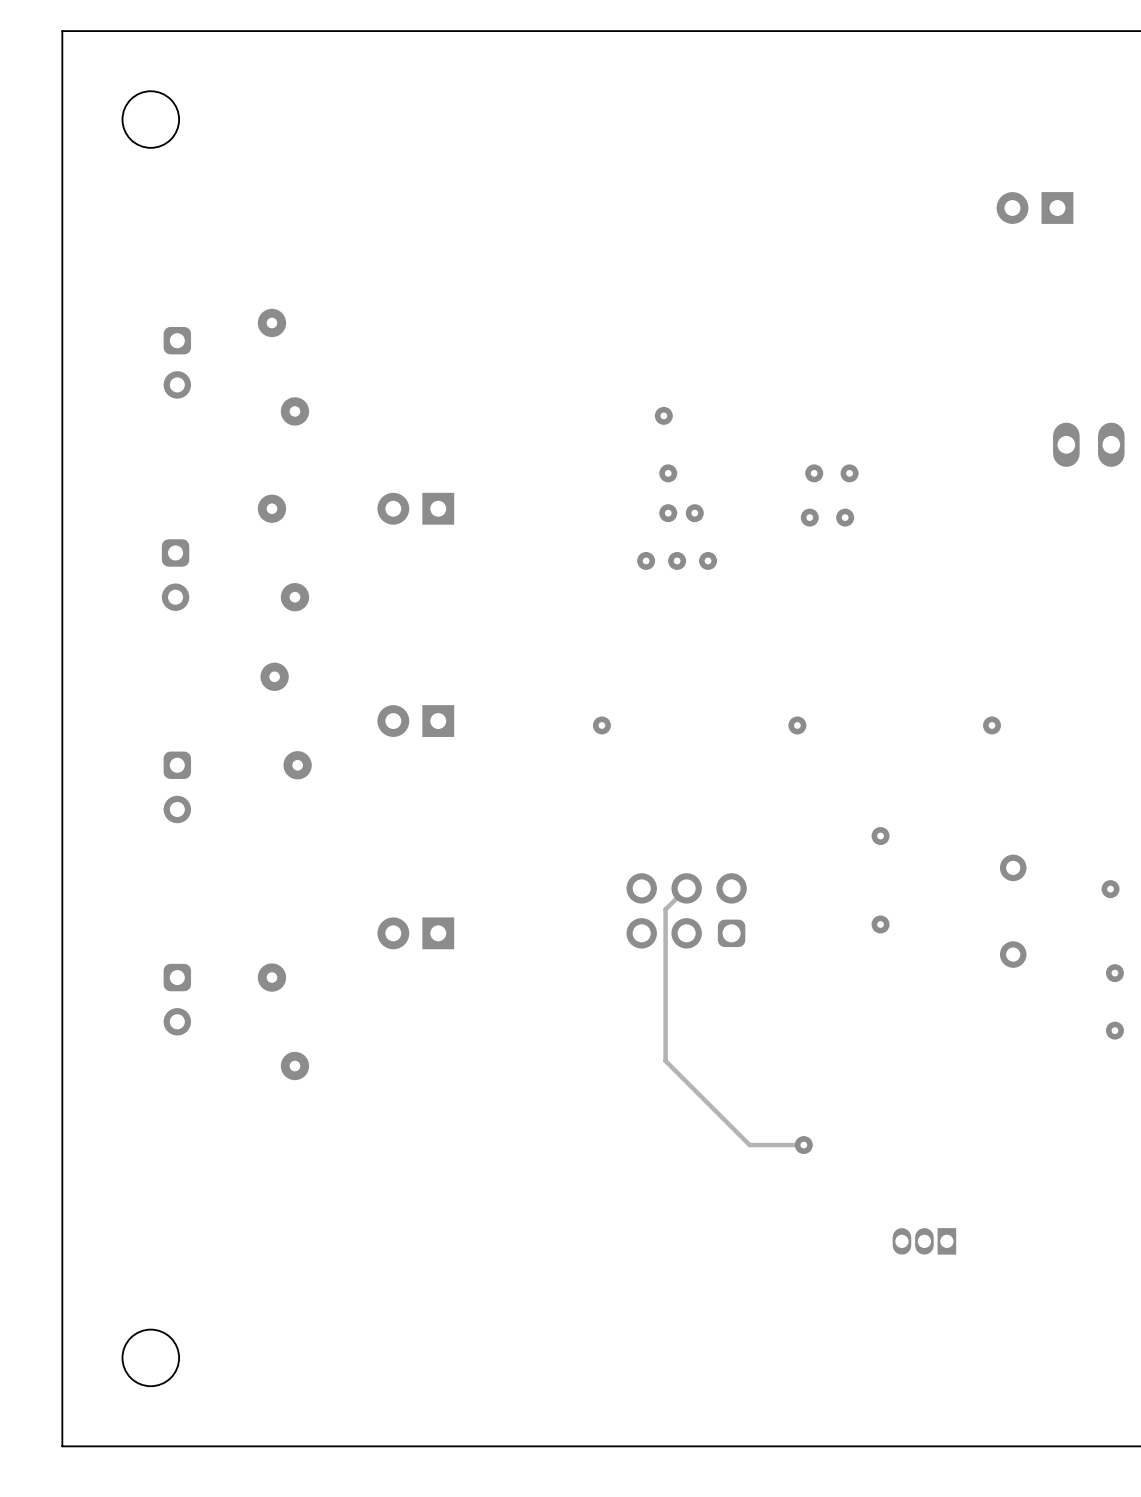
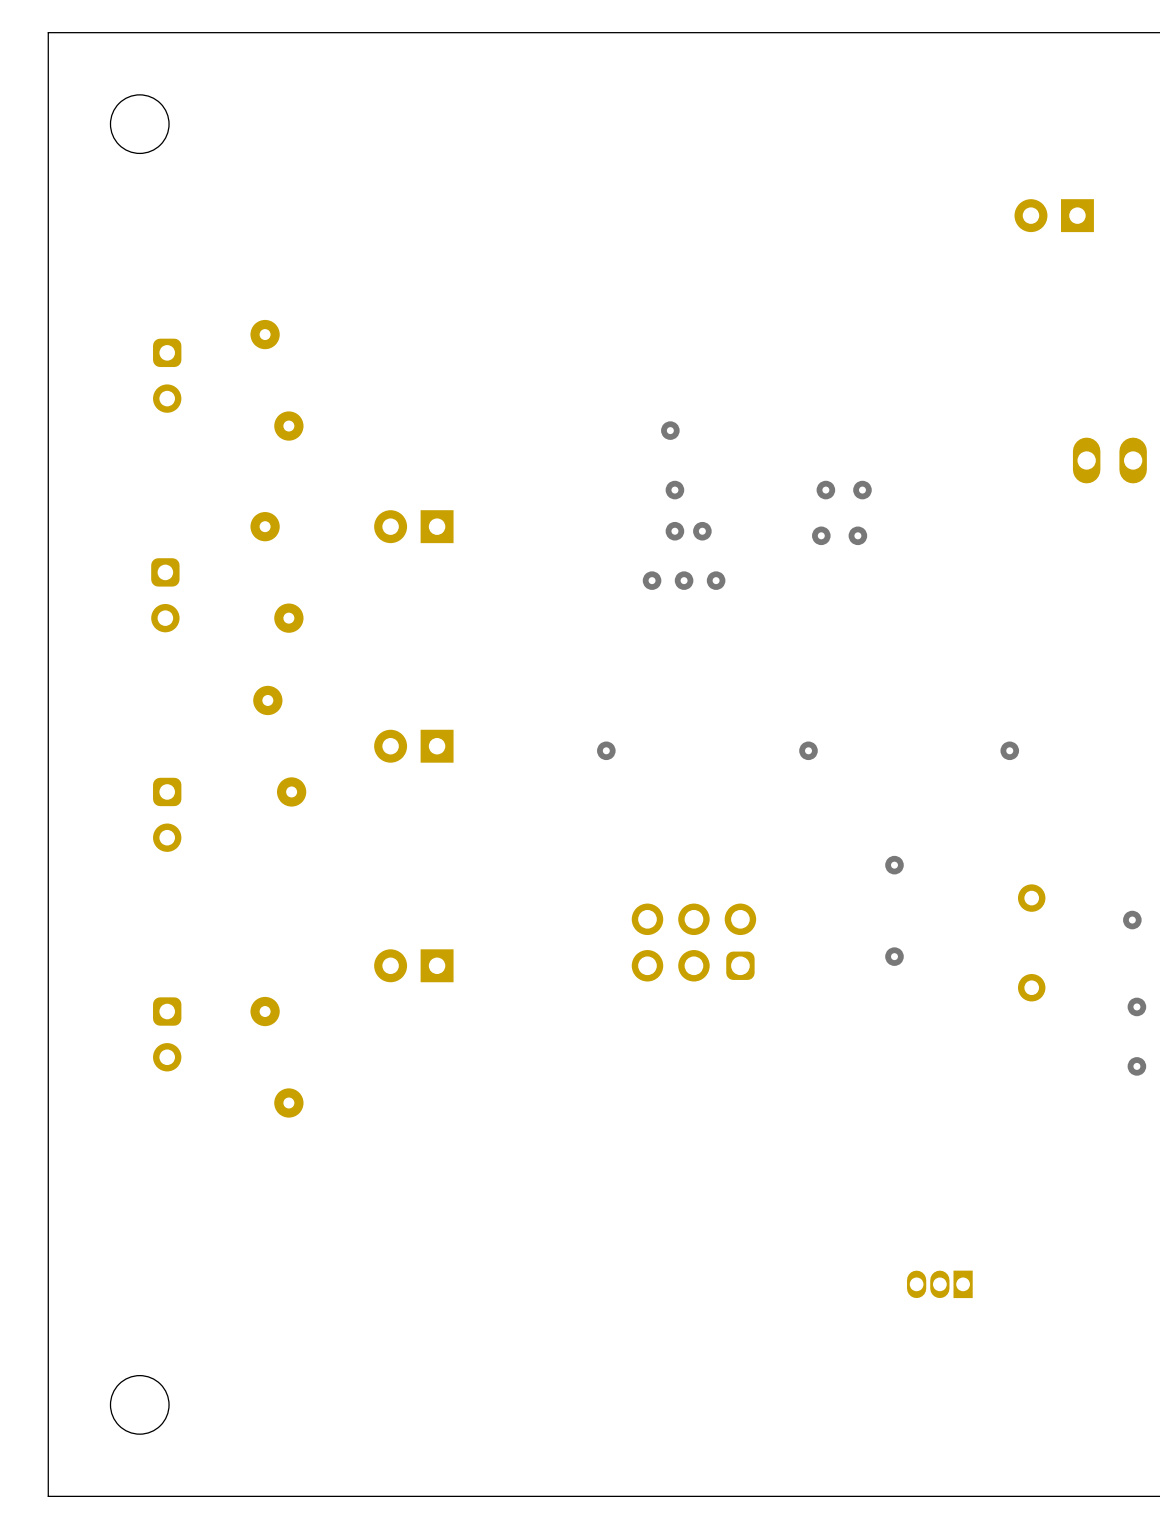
track: (686, 888) (665, 909) (665, 1060) (749, 1145) (803, 1145) -> none
via: (803, 1145) -> none

